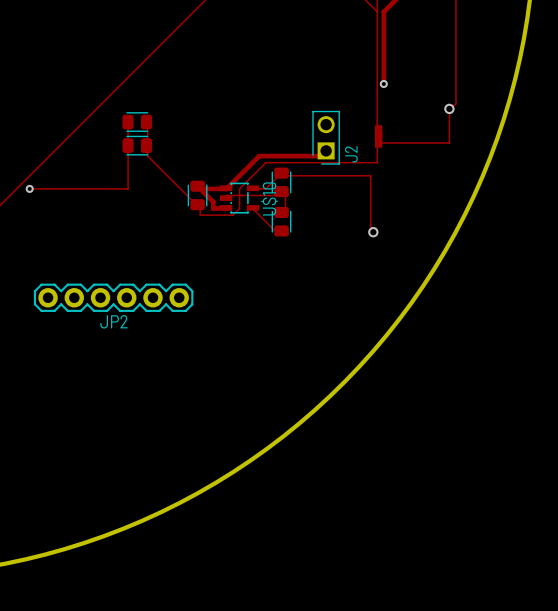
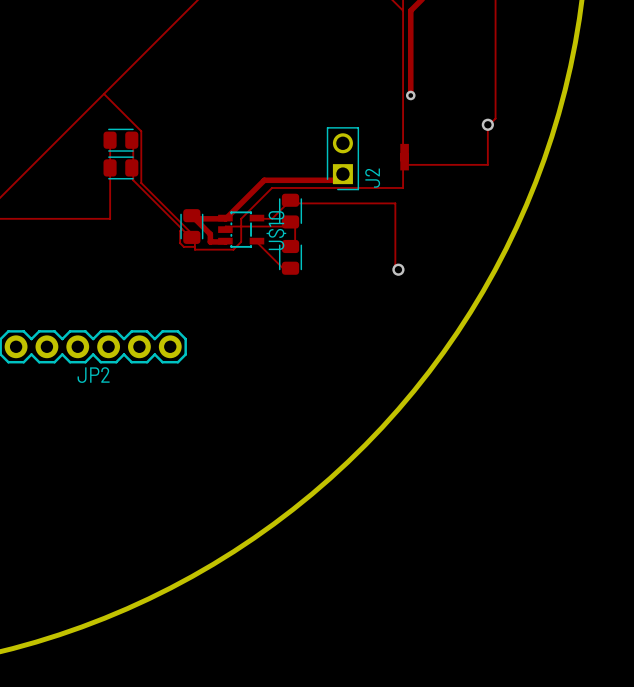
track: none -> (103, 93) (141, 131) (141, 183) (191, 233) (191, 236) (194, 237)
track: none -> (181, 228) (180, 243) (183, 246) (194, 246)

